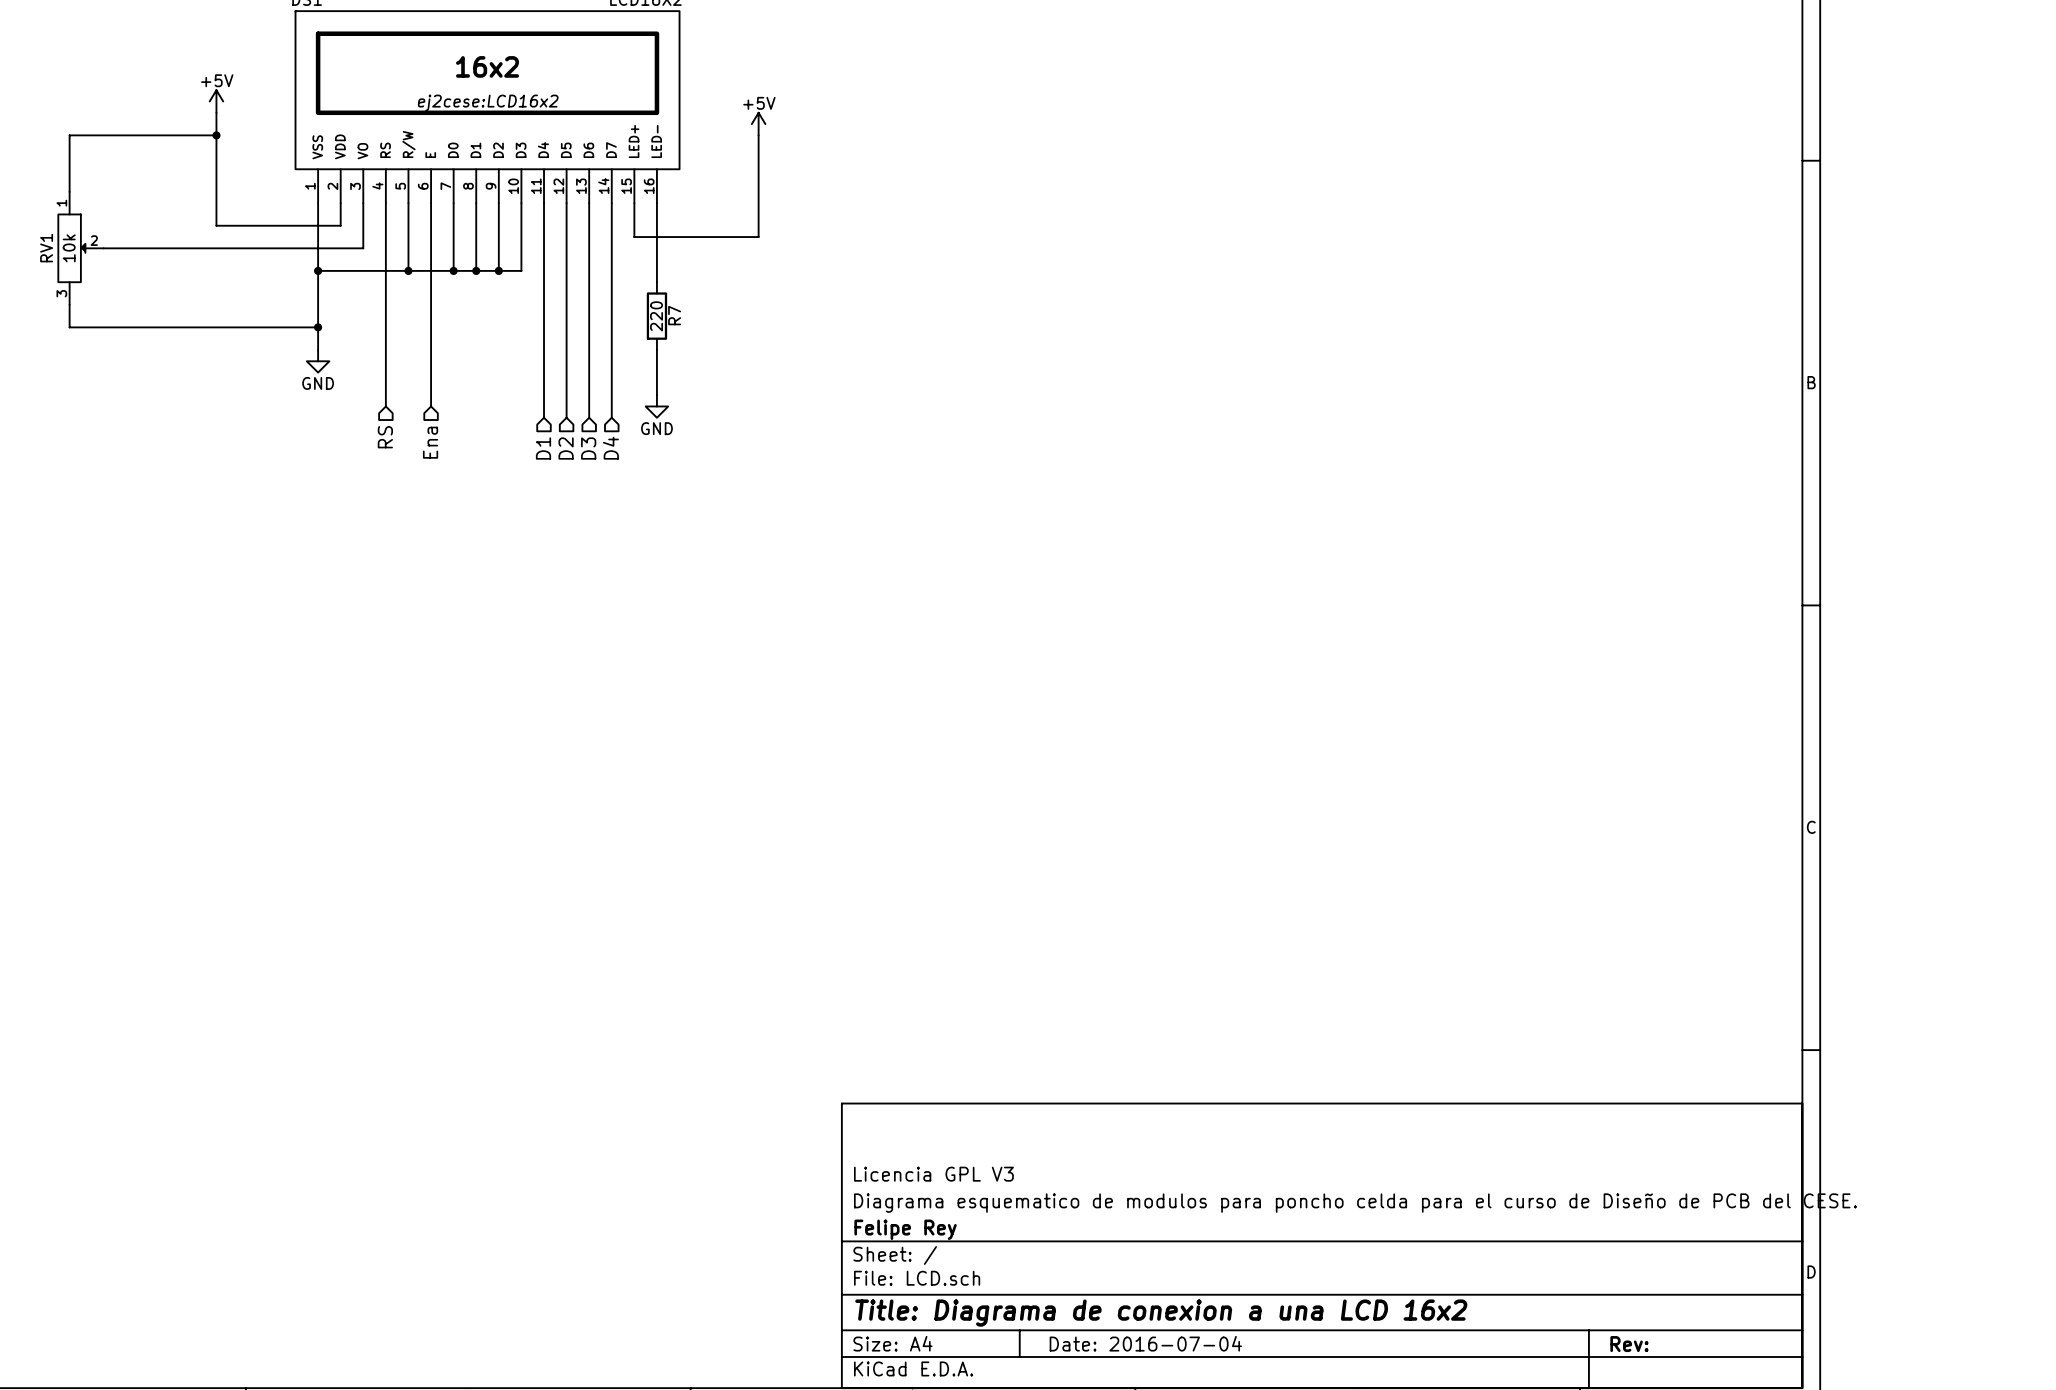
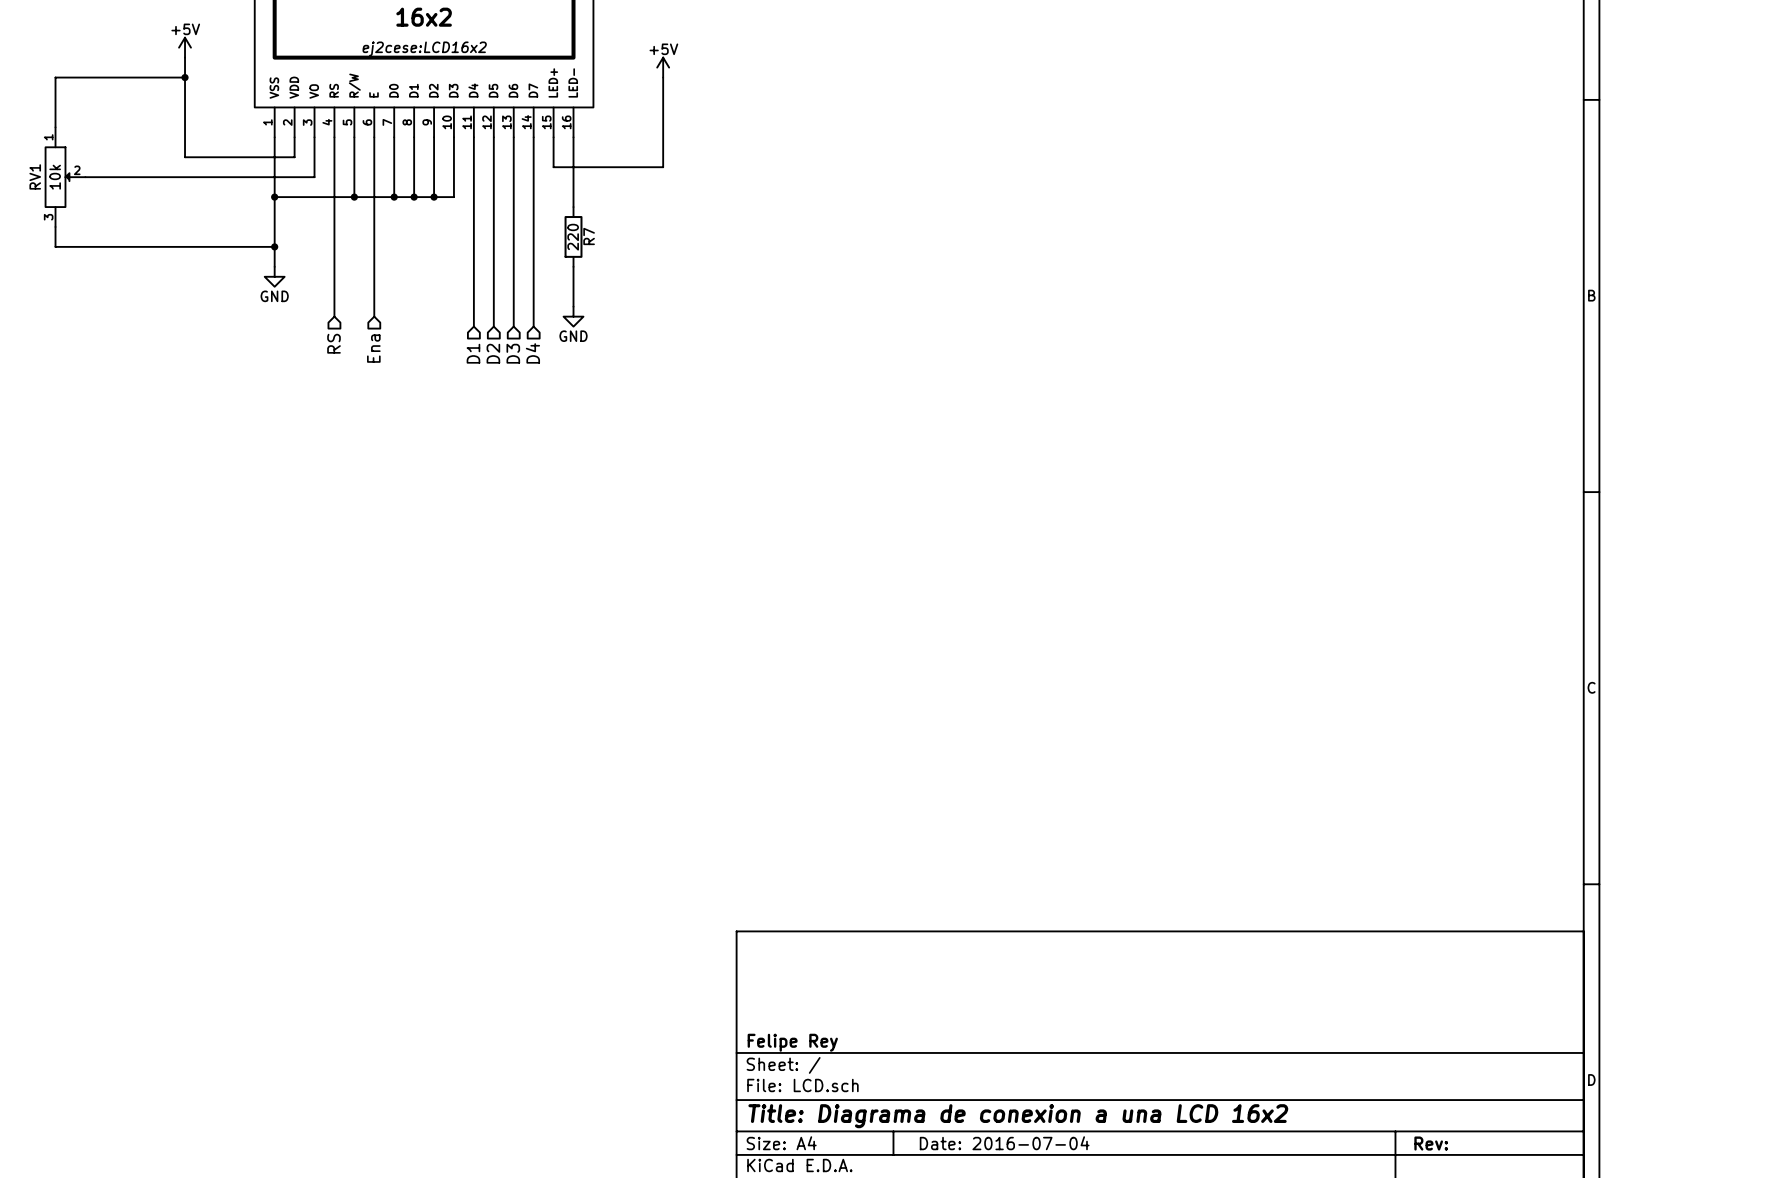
title block: Licencia GPL V3 (933, 1174) -> none
title block: Diagrama esquematico de modulos para poncho celda para el curso de Diseño de PCB del CESE. (1355, 1203) -> none

